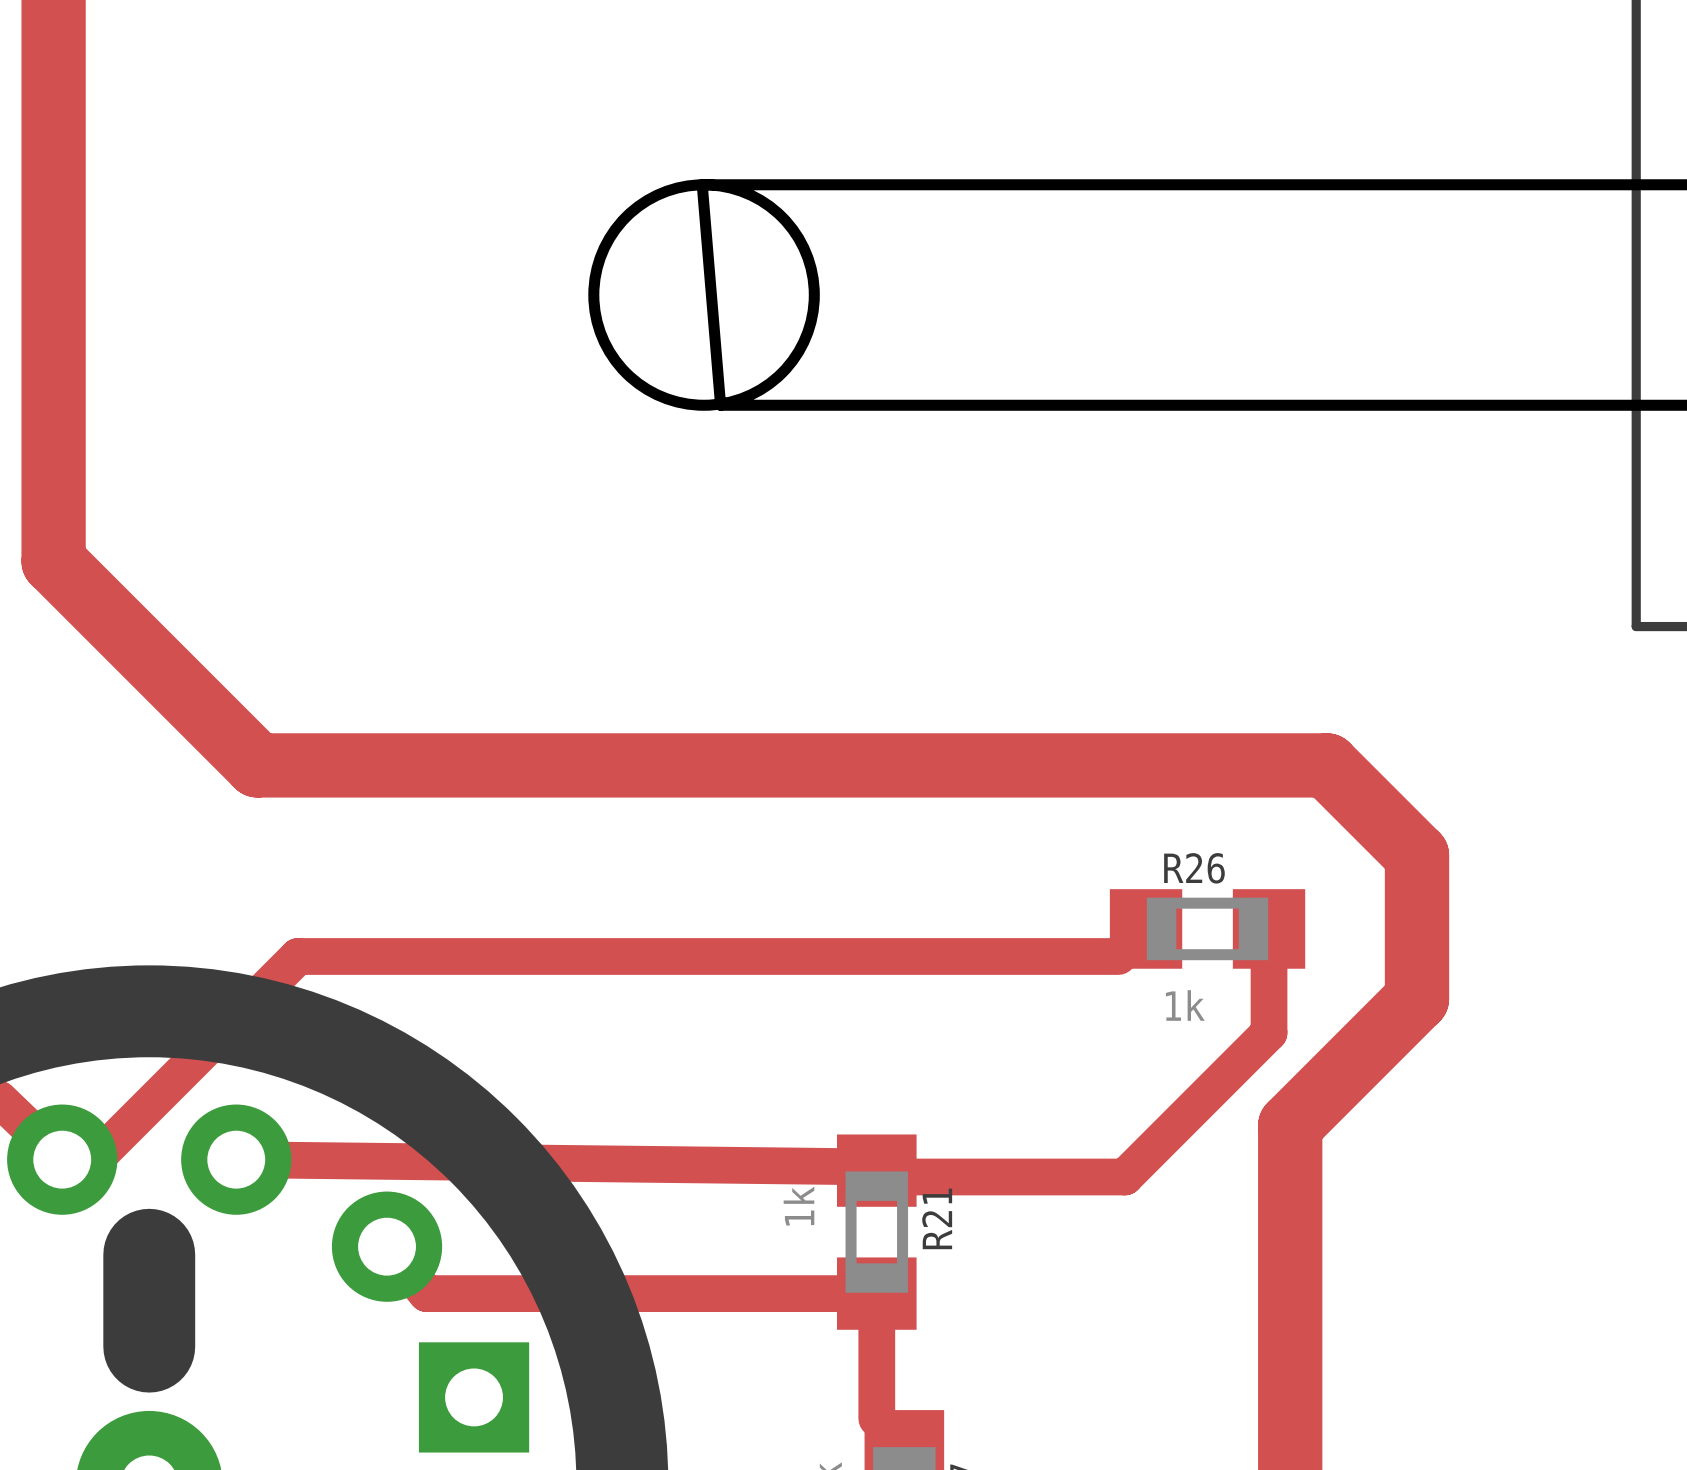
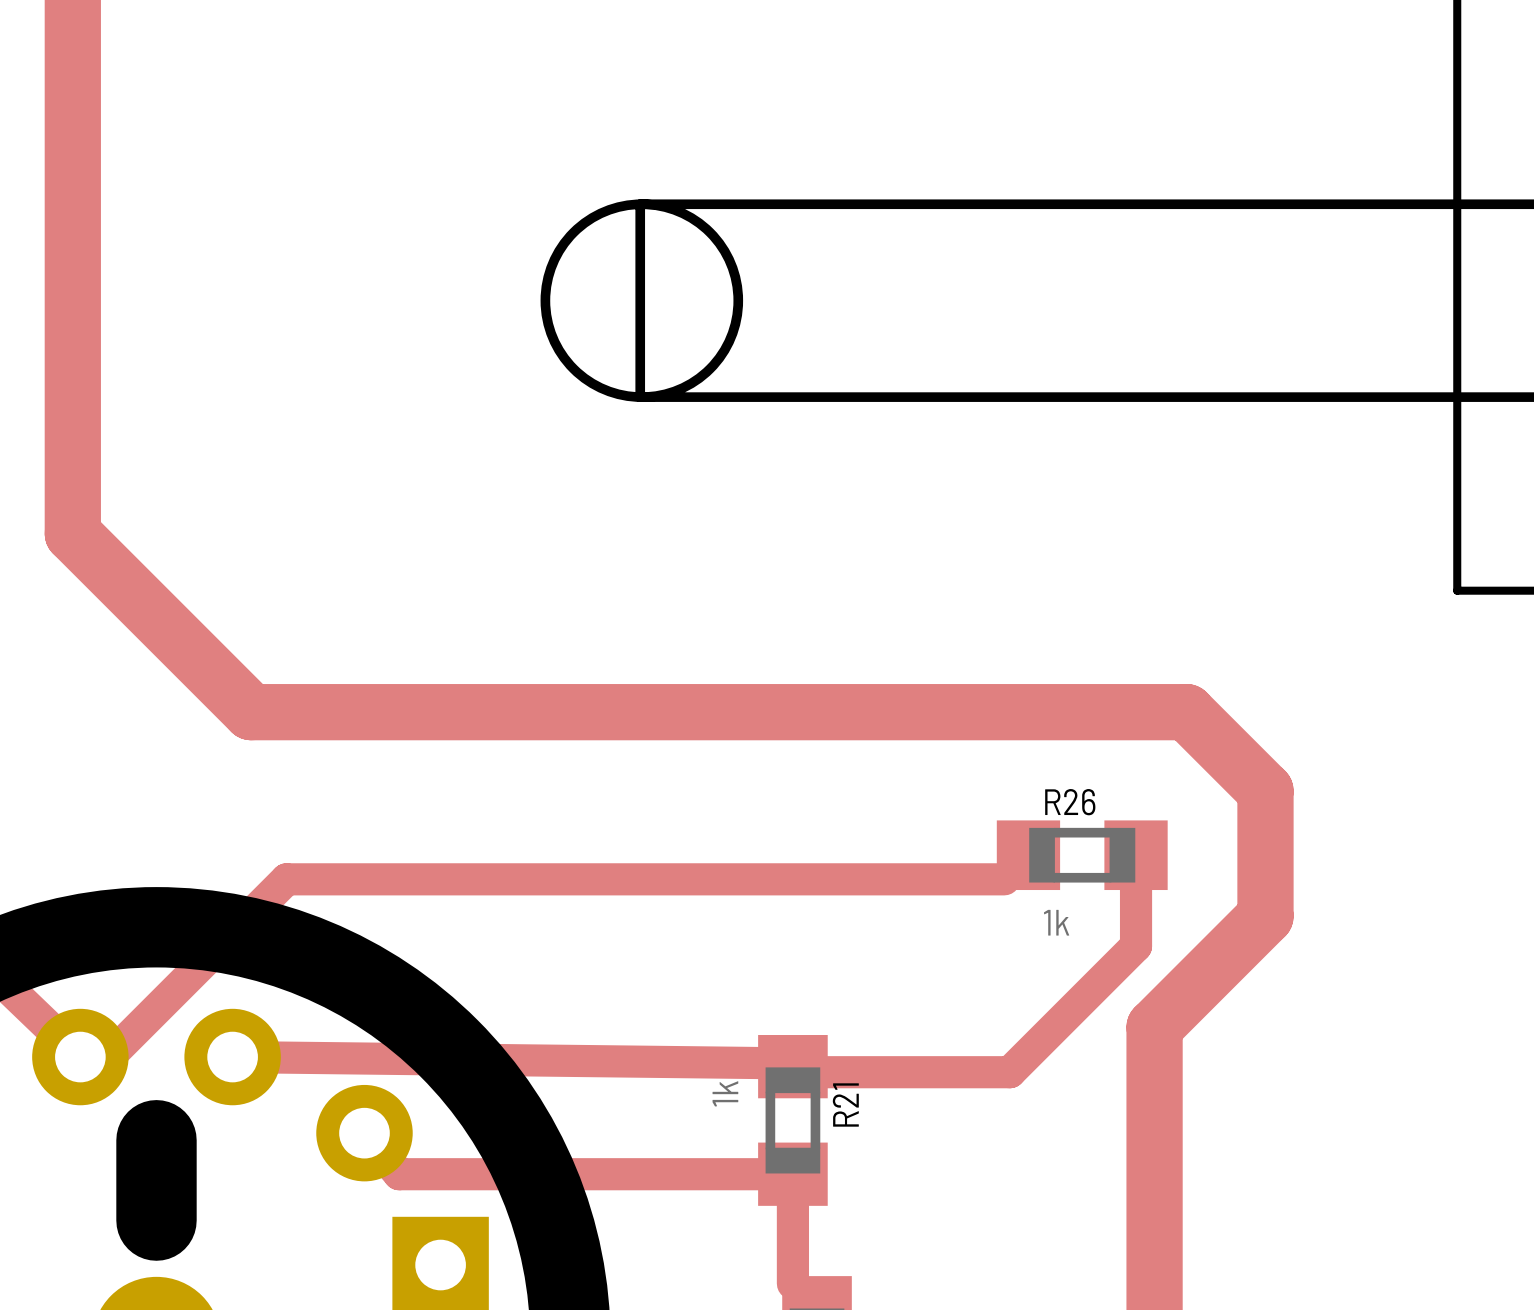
board edge: (702, 184) (720, 405) -> (640, 204) (640, 397) (656, 397)

